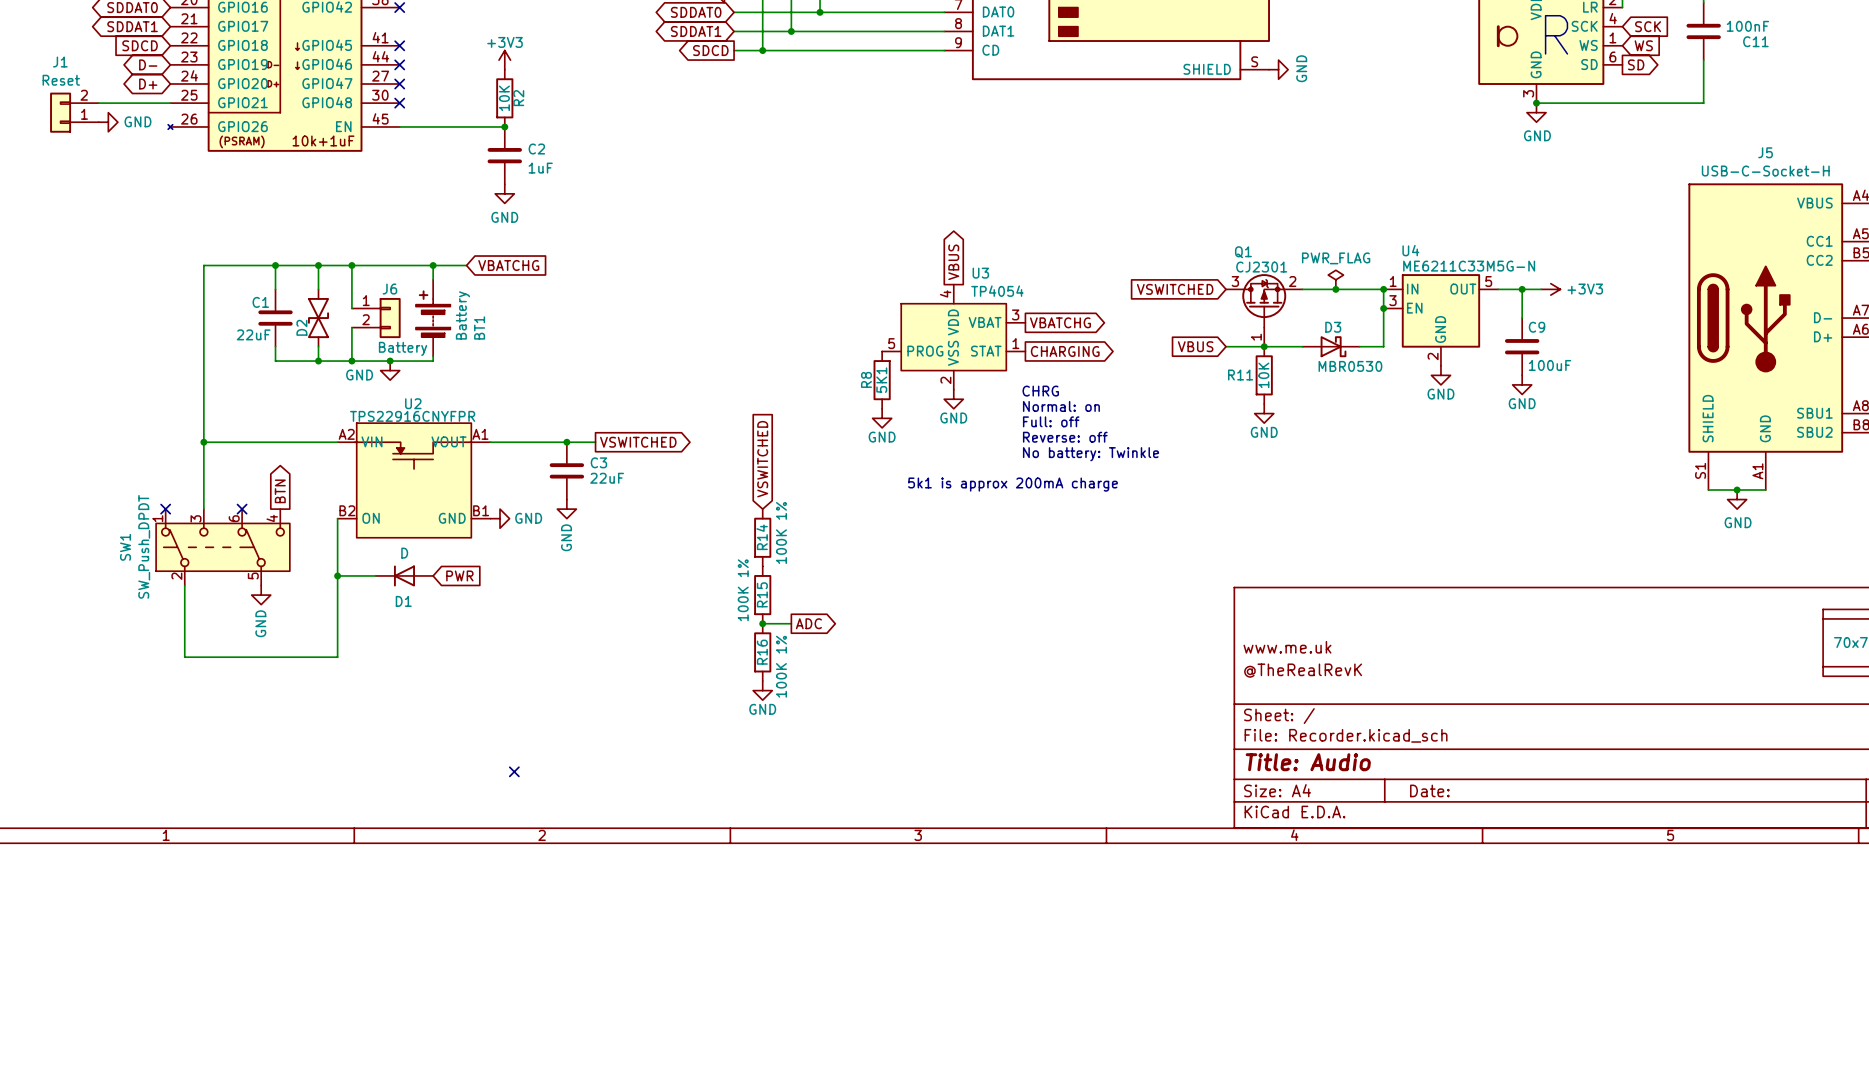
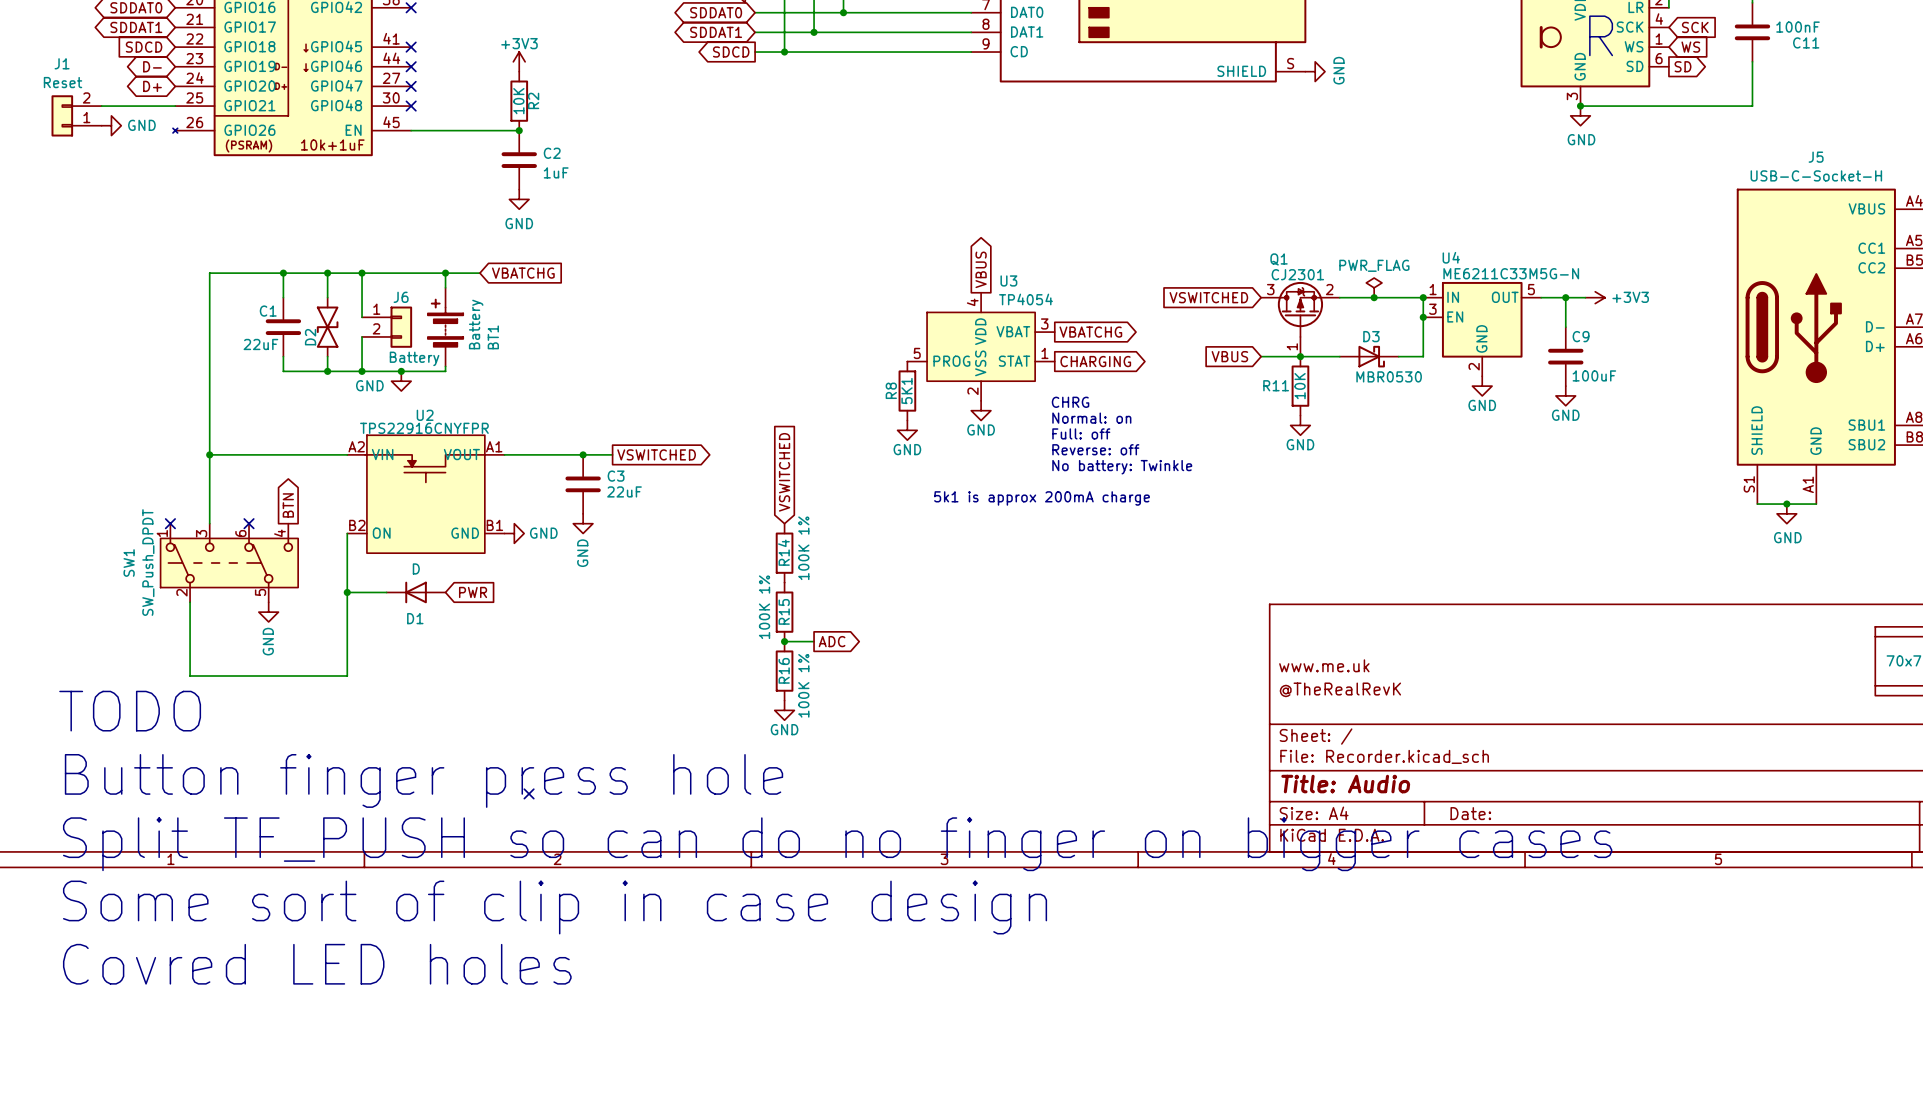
text: none -> TODO (130, 711)
text: none -> Button finger press hole (424, 780)
text: none -> Split TF_PUSH so can do no finger on bigger cases (837, 844)
text: none -> Some sort of clip in case design (555, 907)
text: none -> Covred LED holes (317, 964)

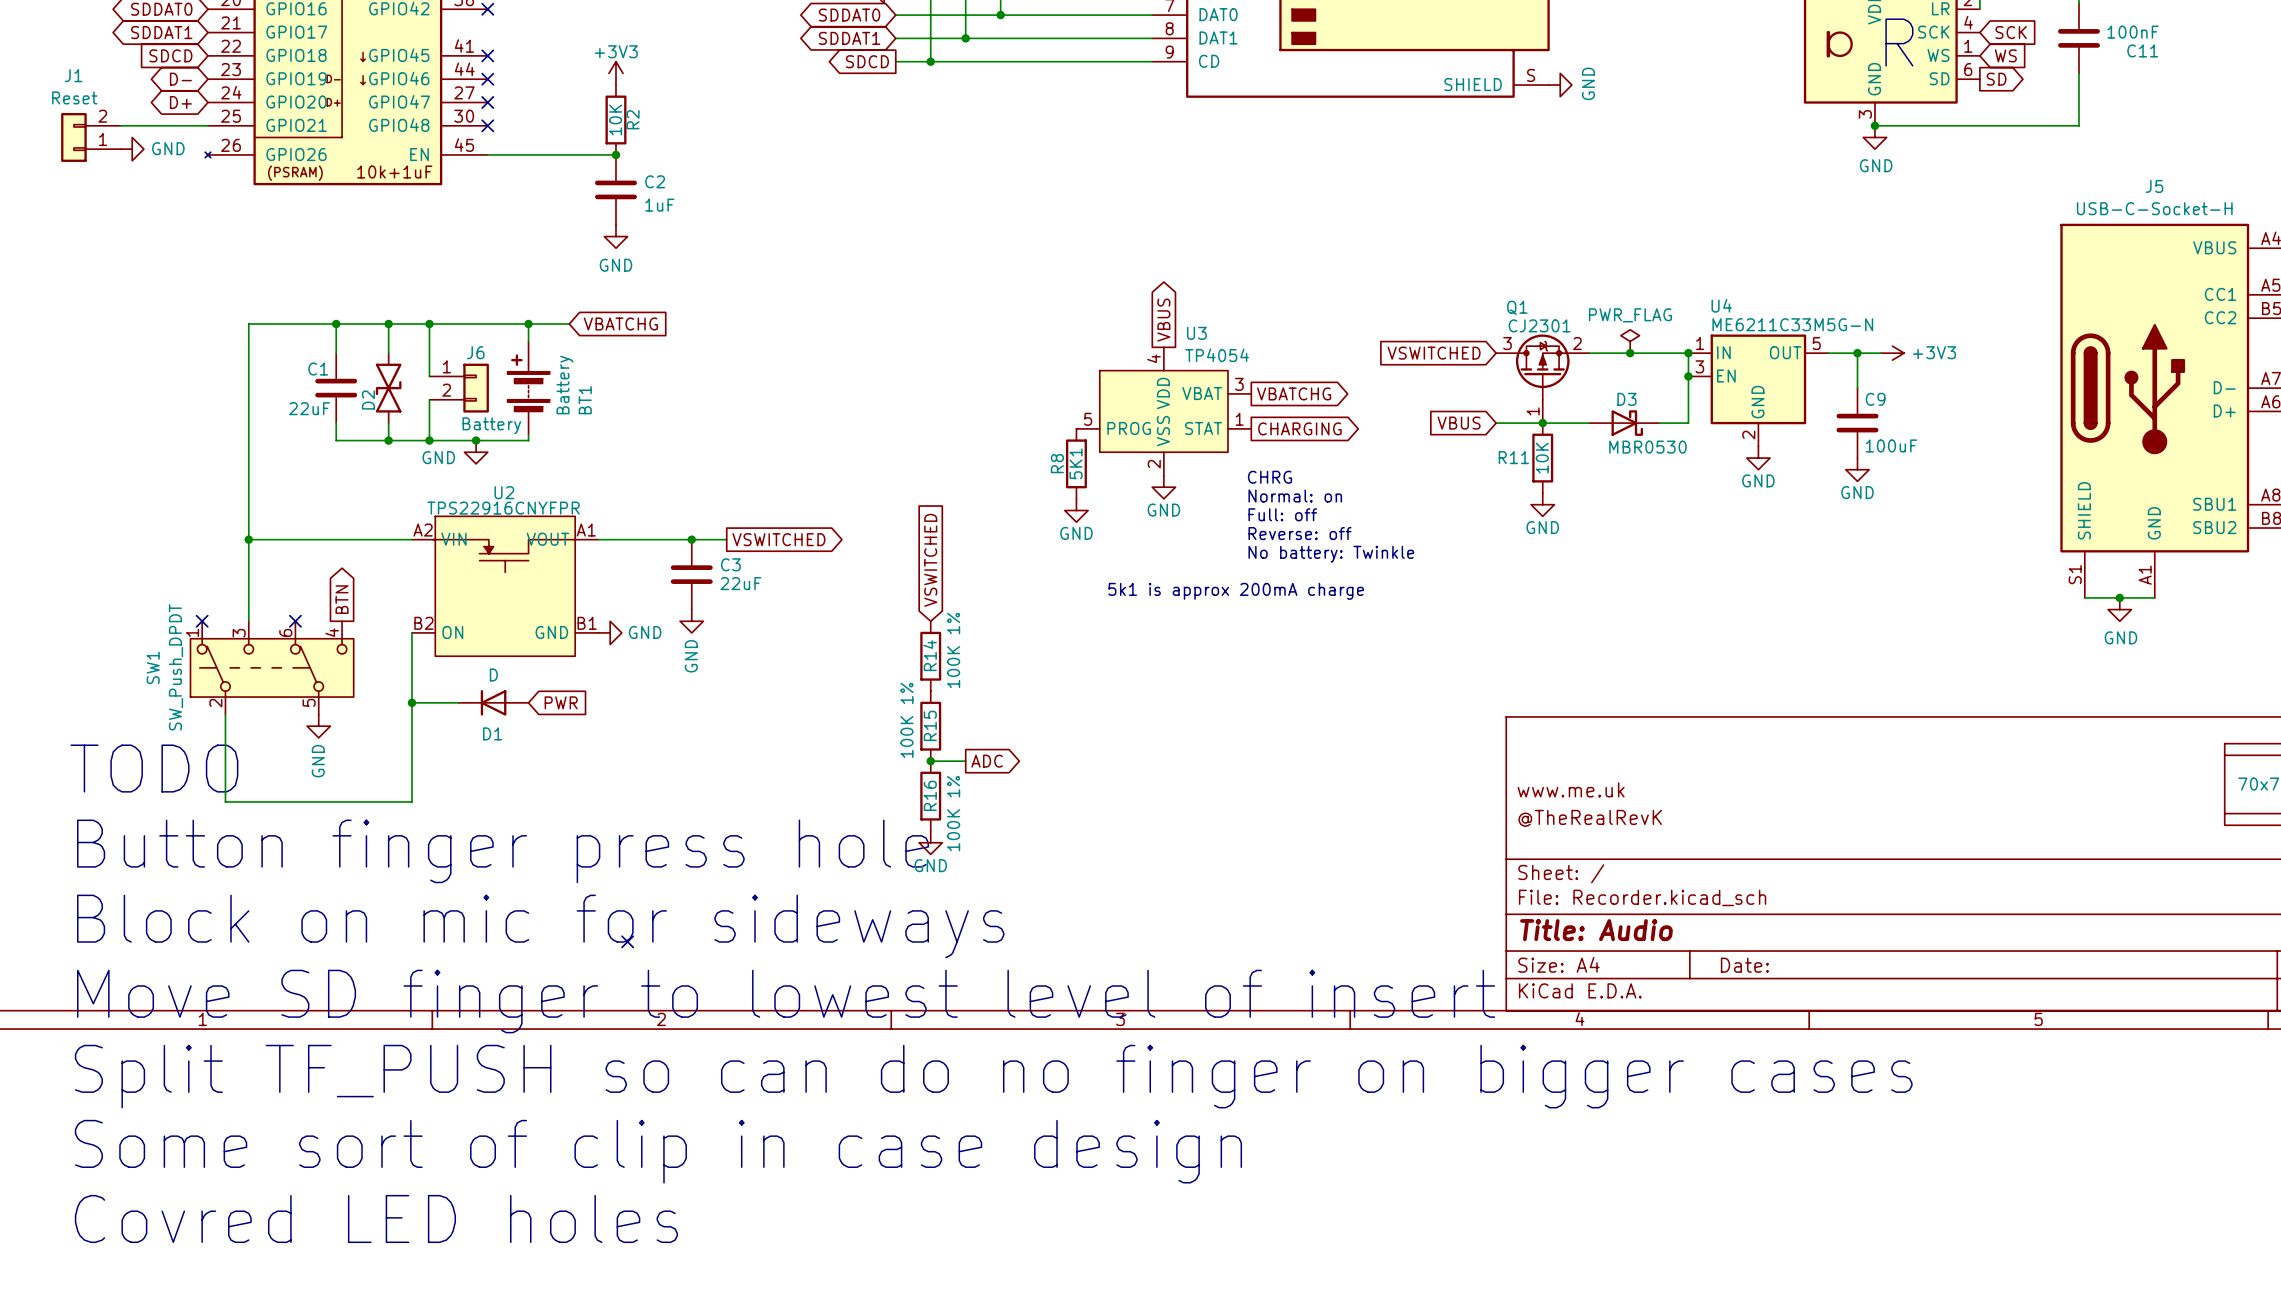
text: none -> TODO (154, 768)
text: TODO (130, 711) -> Button finger press hole (503, 851)
text: Button finger press hole (424, 780) -> Block on mic for sideways (540, 926)
text: Split TF_PUSH so can do no finger on bigger cases (837, 844) -> Move SD finger to lowest level of insert (786, 1001)
text: Some sort of clip in case design (555, 907) -> Split TF_PUSH so can do no finger on bigger cases (993, 1076)
text: Covred LED holes (317, 964) -> Some sort of clip in case design (658, 1151)
text: none -> Covred LED holes (376, 1218)

